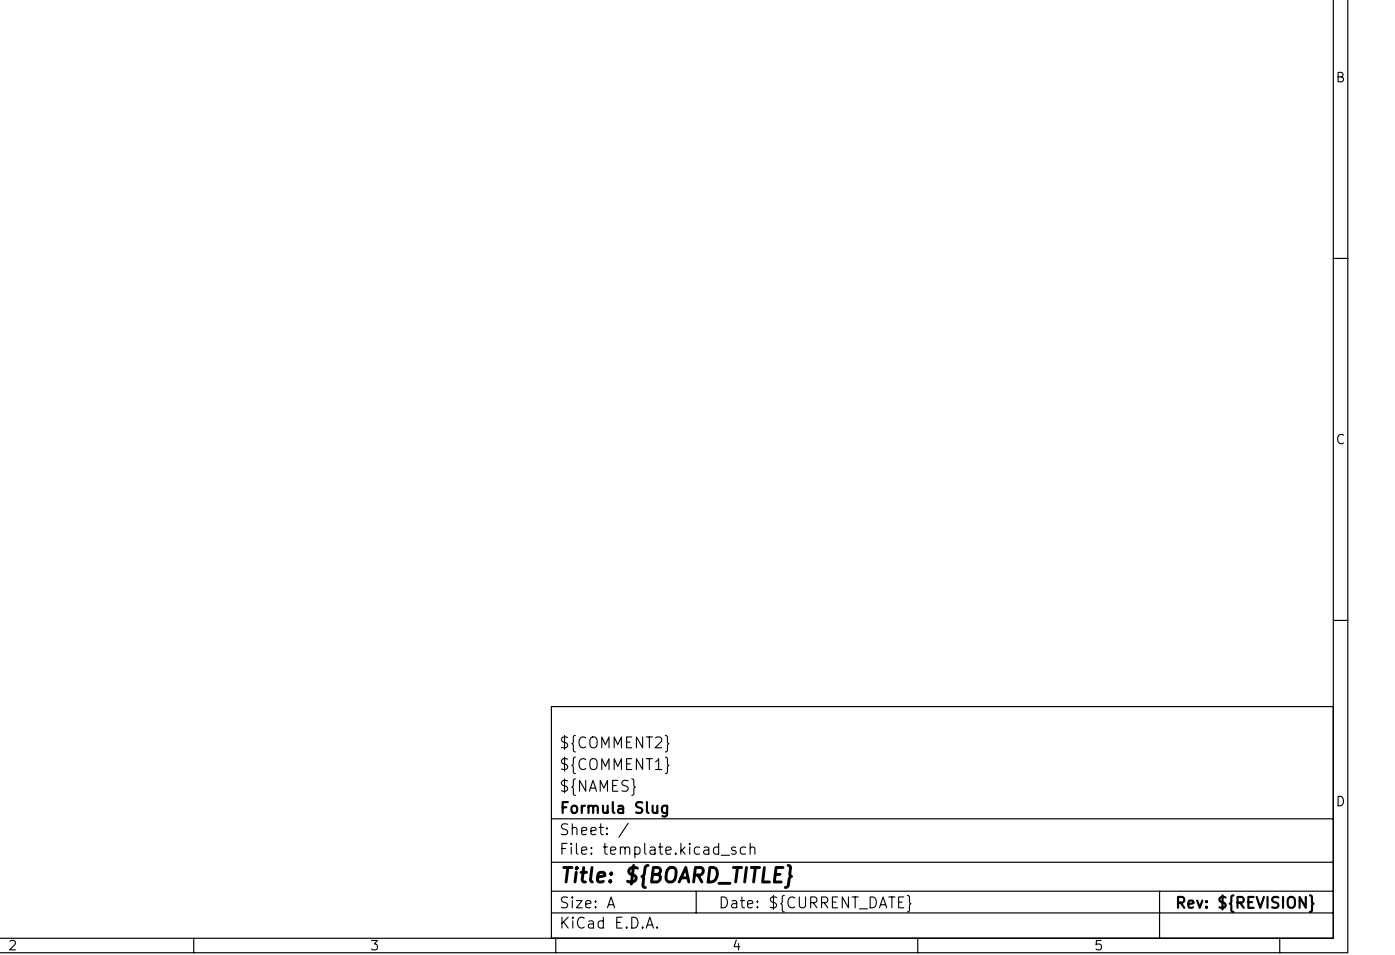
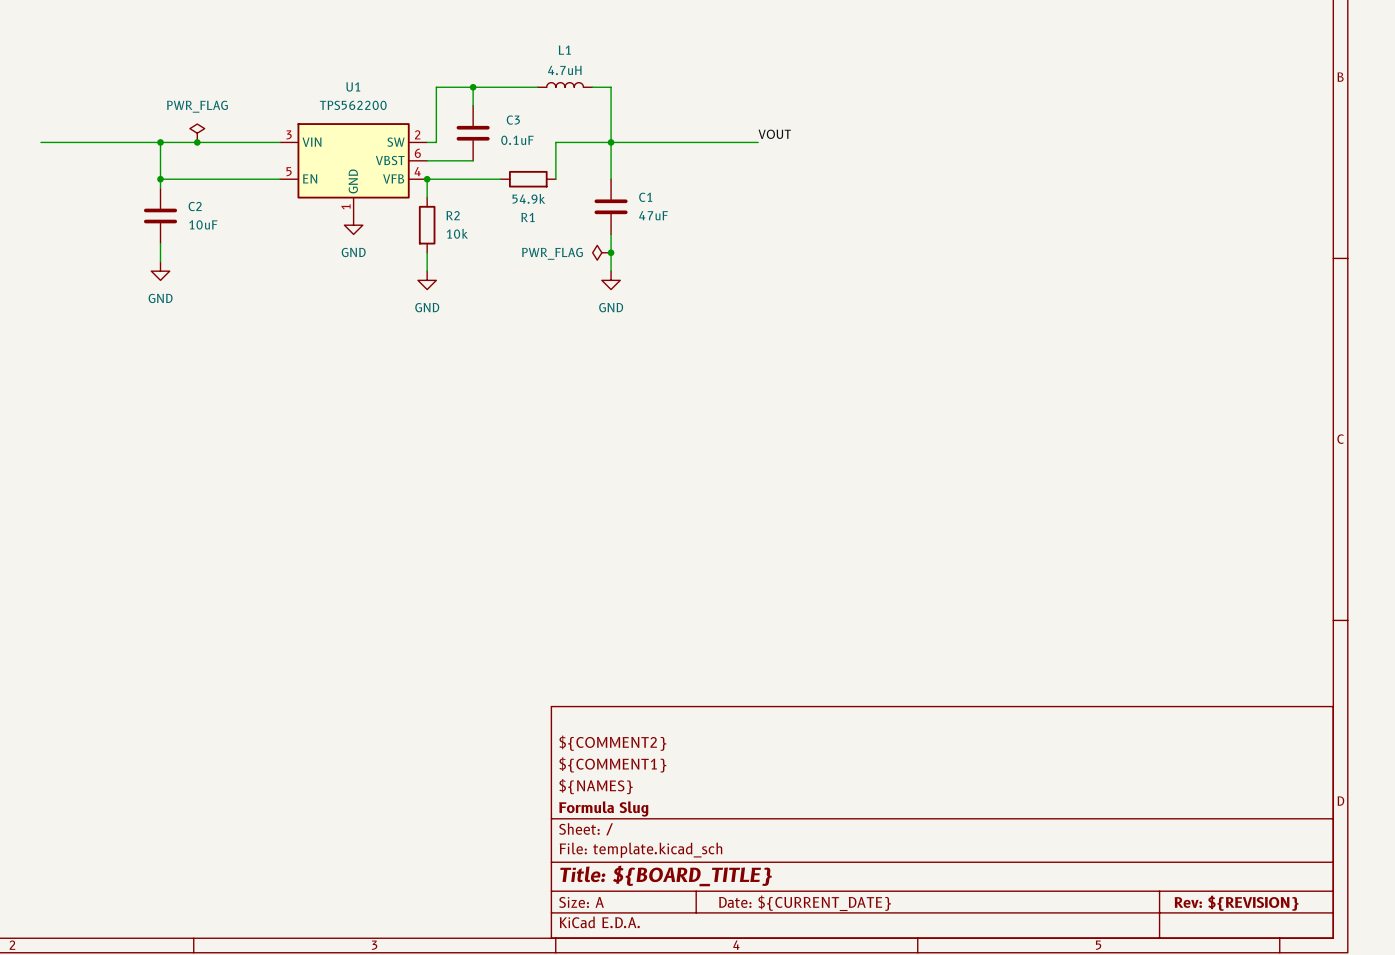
L1: none -> 4.7uH (565, 84)
wire: none -> (473, 87) (473, 105)
junction: none -> (473, 87)
wire: none -> (537, 87) (436, 87) (436, 142) (427, 142)
wire: none -> (592, 87) (611, 87) (611, 179)
power symbol: none -> PWR_FLAG (197, 133)
C3: none -> 0.1uF (473, 133)
label: none -> VOUT (774, 134)
wire: none -> (40, 142) (280, 142)
wire: none -> (160, 142) (160, 188)
junction: none -> (160, 142)
junction: none -> (197, 142)
junction: none -> (611, 142)
wire: none -> (758, 142) (555, 142) (555, 179)
wire: none -> (427, 160) (473, 160)
U1: none -> TPS562200 (353, 169)
wire: none -> (160, 179) (280, 179)
junction: none -> (160, 179)
junction: none -> (427, 179)
wire: none -> (500, 179) (427, 179) (427, 197)
R1: none -> 54.9k (528, 179)
C1: none -> 47uF (611, 206)
C2: none -> 10uF (160, 215)
power symbol: none -> GND (353, 225)
R2: none -> 10k (427, 225)
wire: none -> (611, 234) (611, 271)
wire: none -> (160, 243) (160, 261)
wire: none -> (427, 252) (427, 271)
power symbol: none -> PWR_FLAG (601, 252)
junction: none -> (611, 252)
power symbol: none -> GND (160, 271)
power symbol: none -> GND (427, 280)
power symbol: none -> GND (611, 280)

